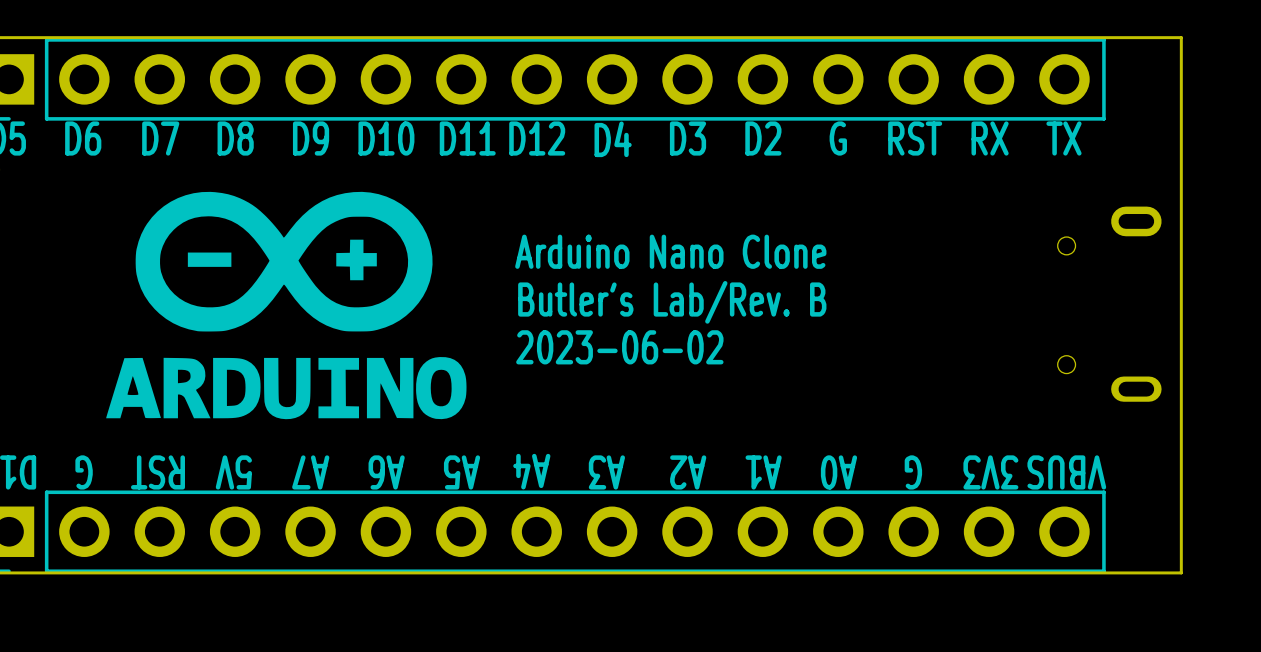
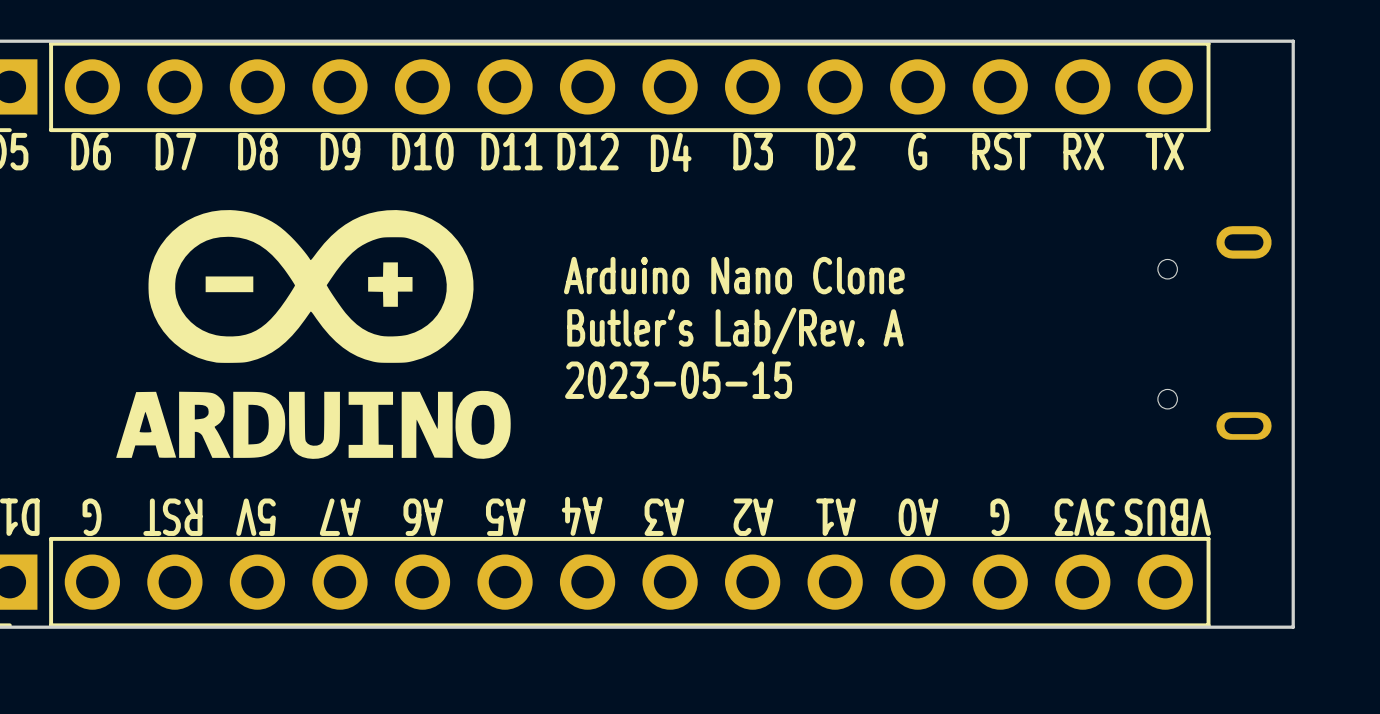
text: Butler's Lab/Rev. B (672, 302) -> Butler's Lab/Rev. A (735, 330)
text: 2023-06-02 (619, 347) -> 2023-05-15 (678, 380)

